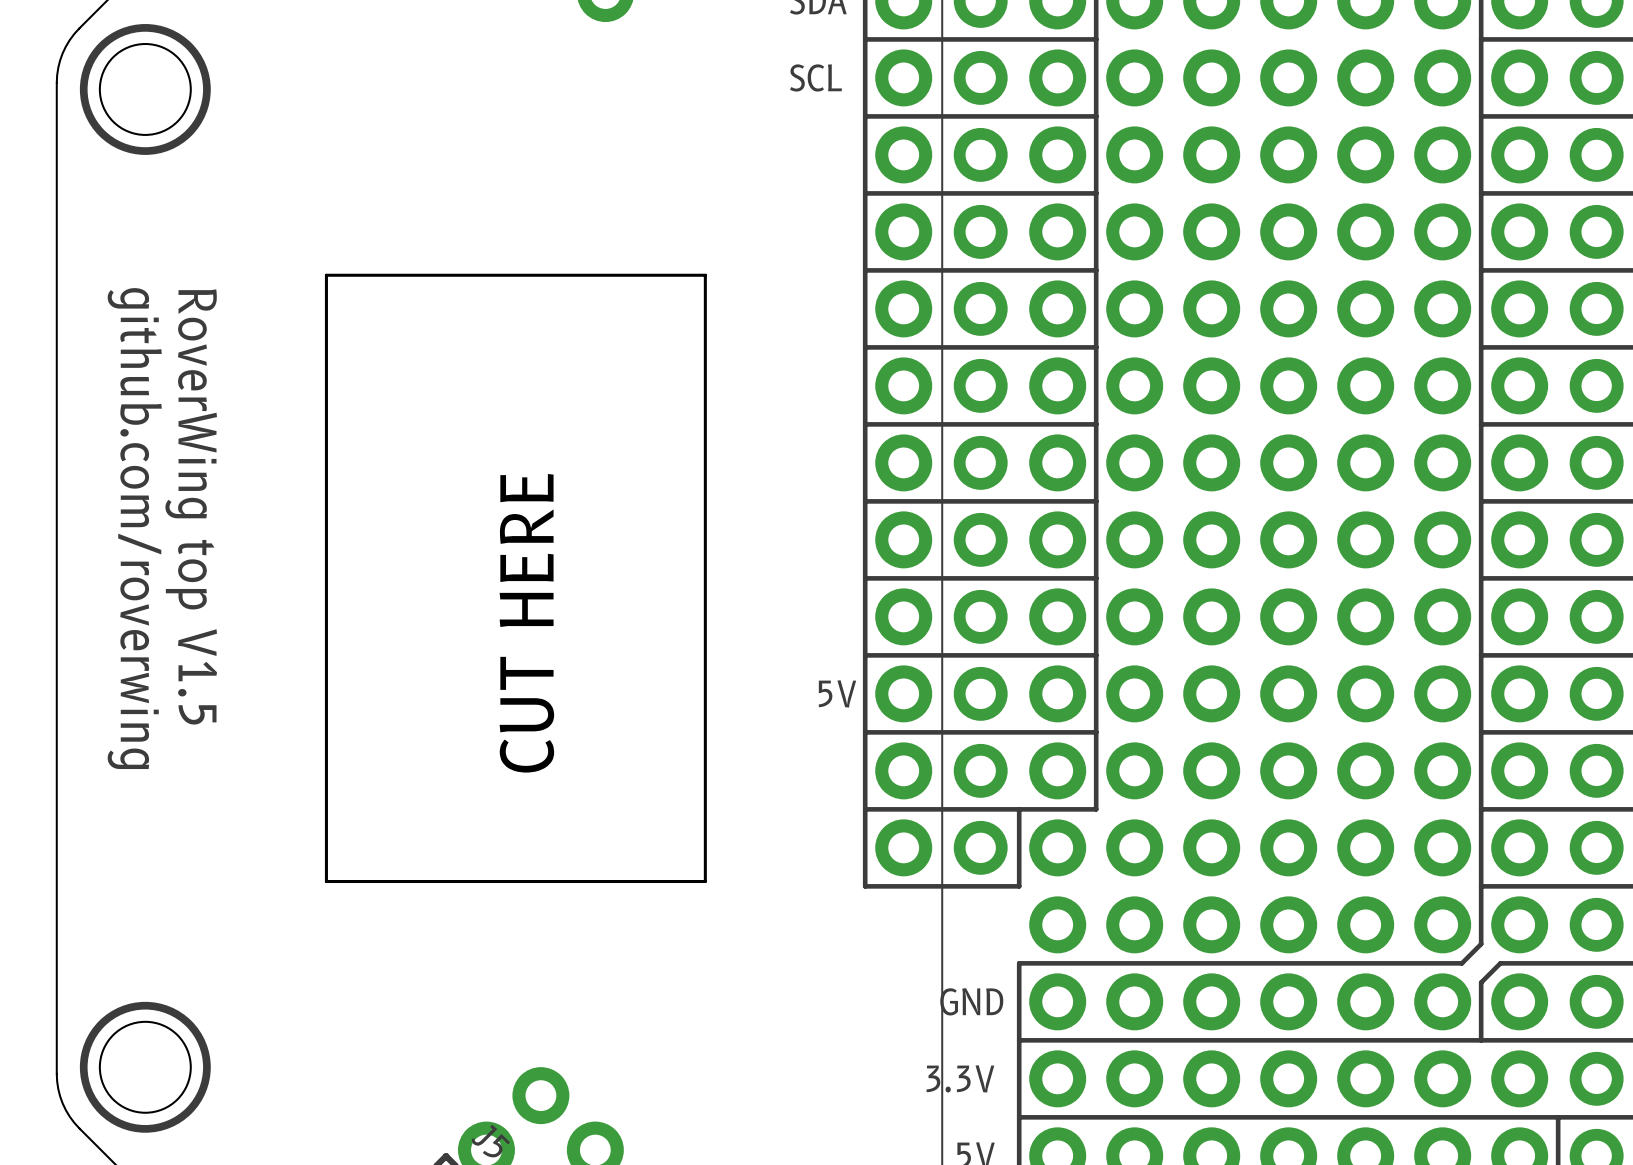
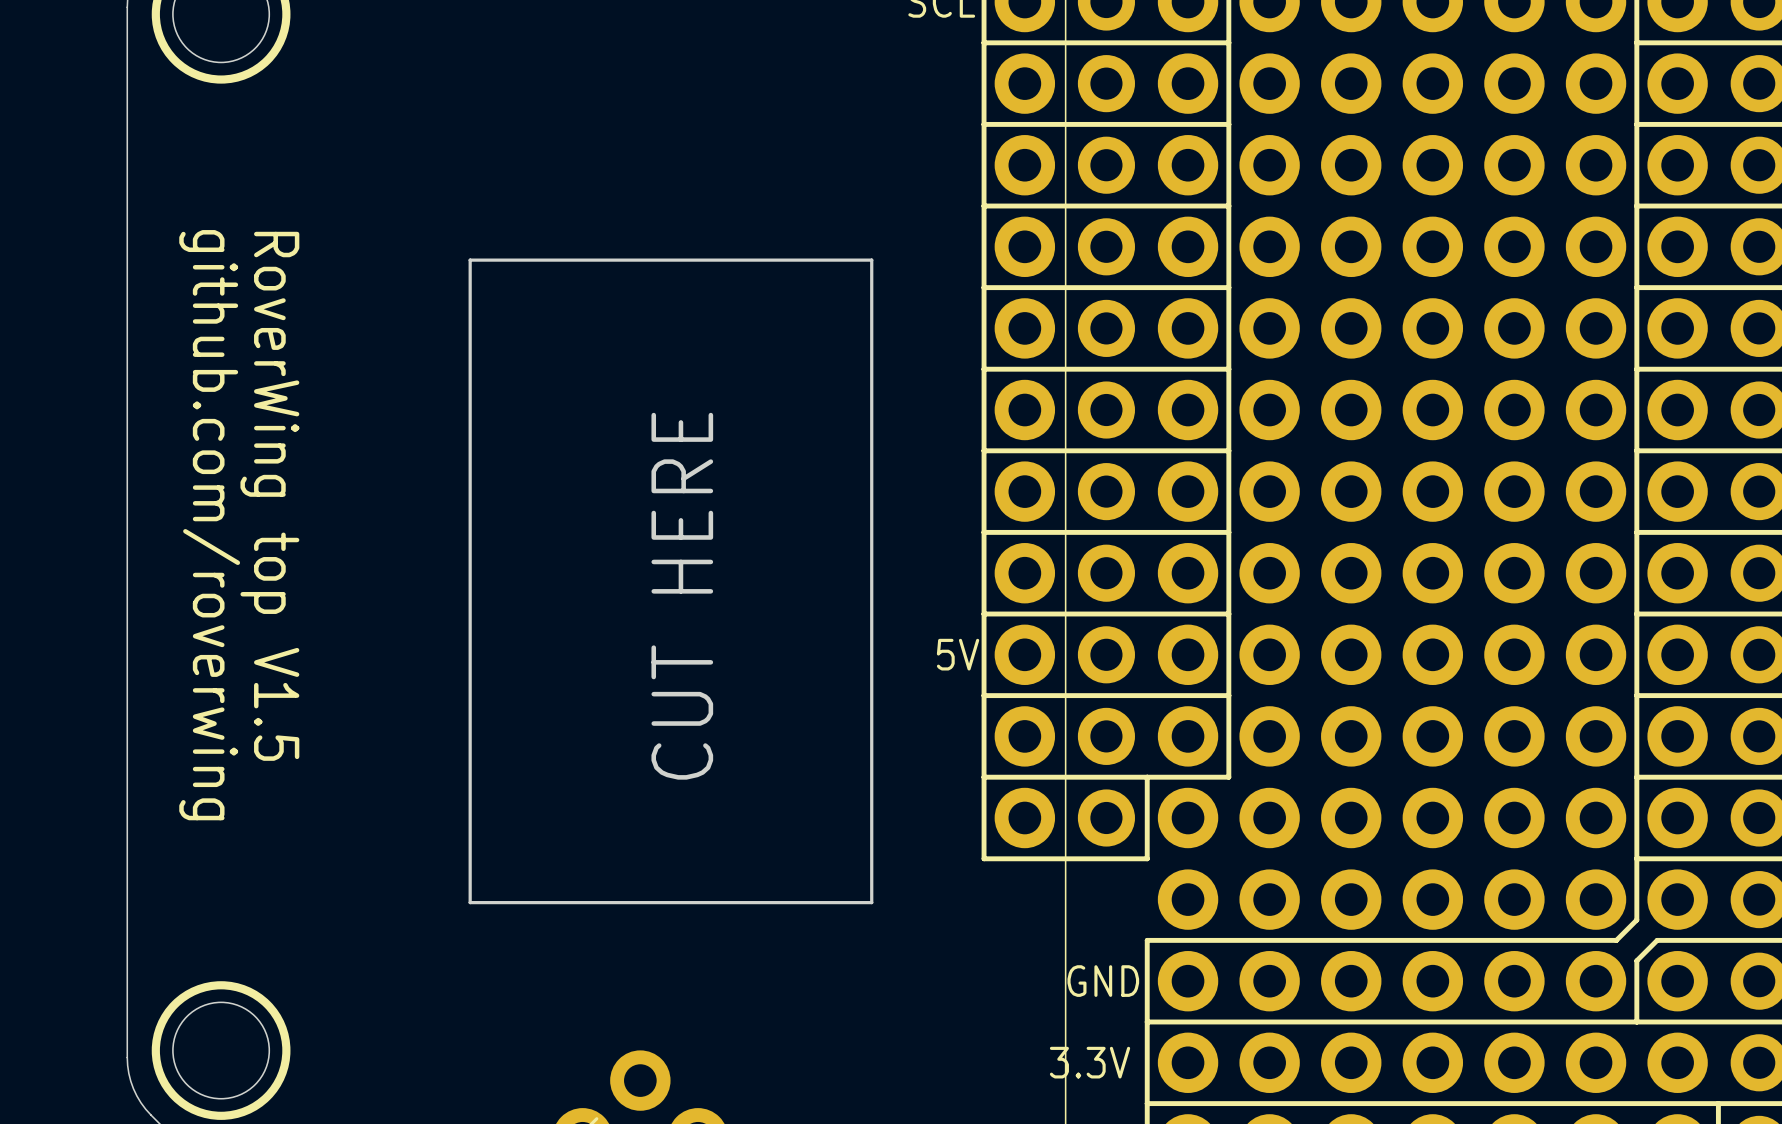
board edge: (326, 275) (705, 275) (705, 881) (326, 881) (326, 275) -> (470, 260) (470, 902) (871, 902) (871, 260) (470, 260)
text position: CUT HERE (526, 623) -> CUT HERE (682, 596)

